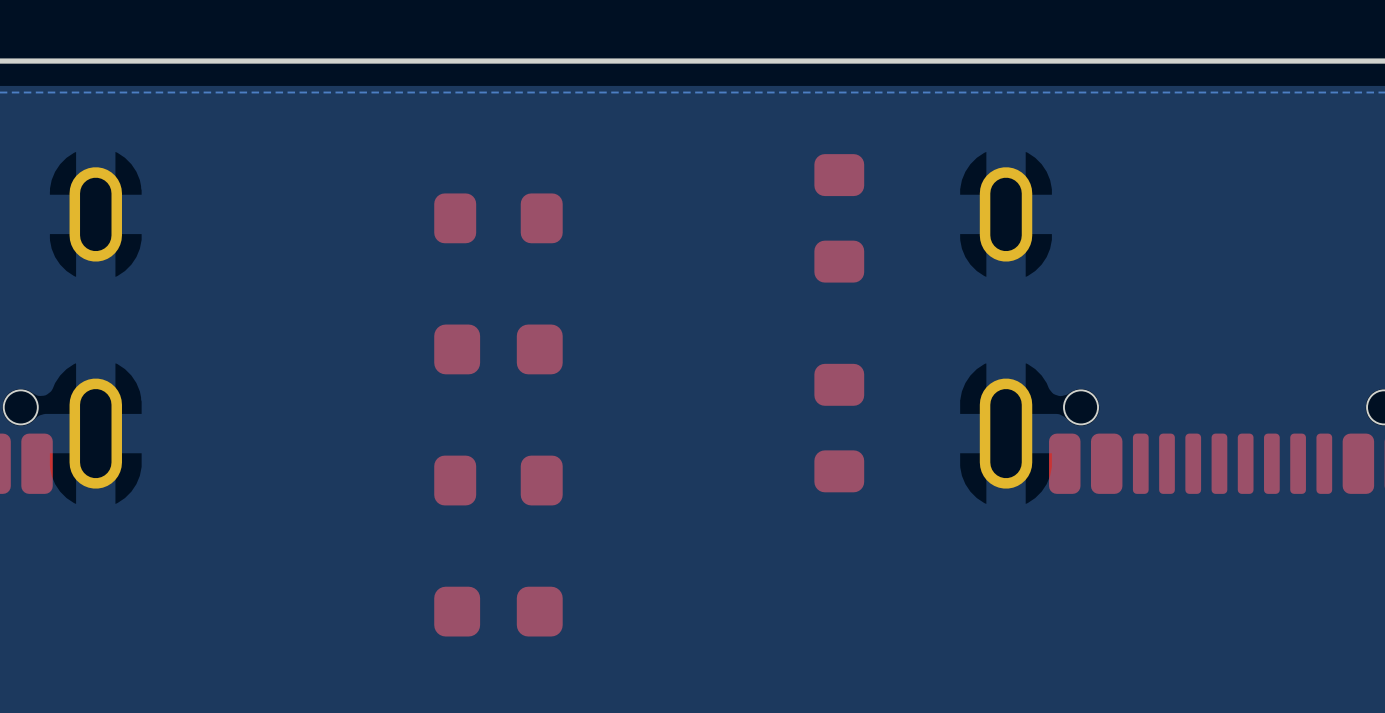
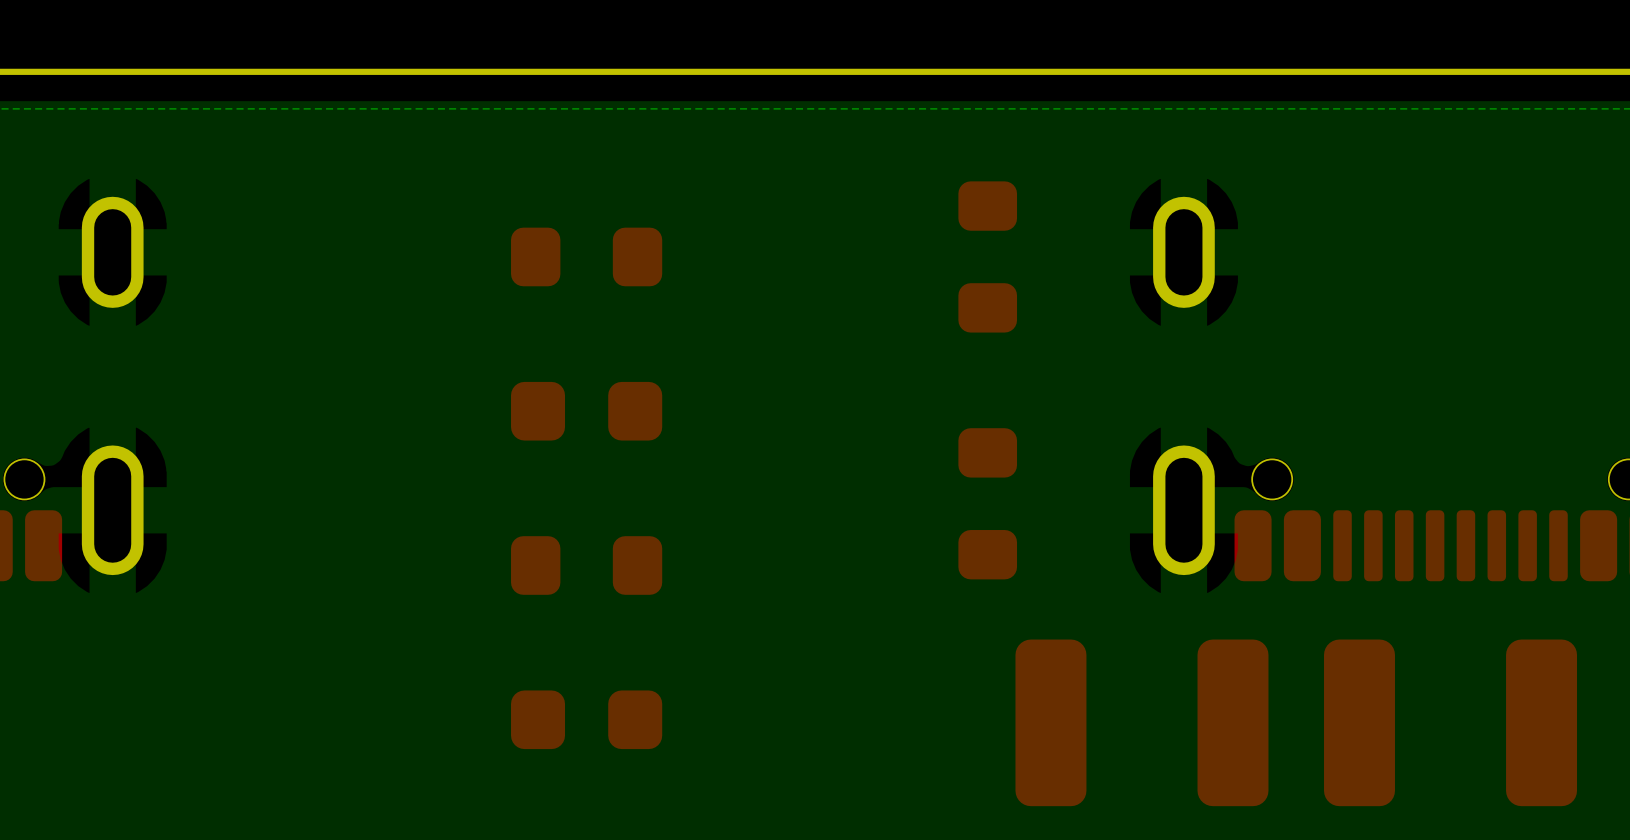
part: none -> (1141, 722)
part: none -> (1450, 722)

